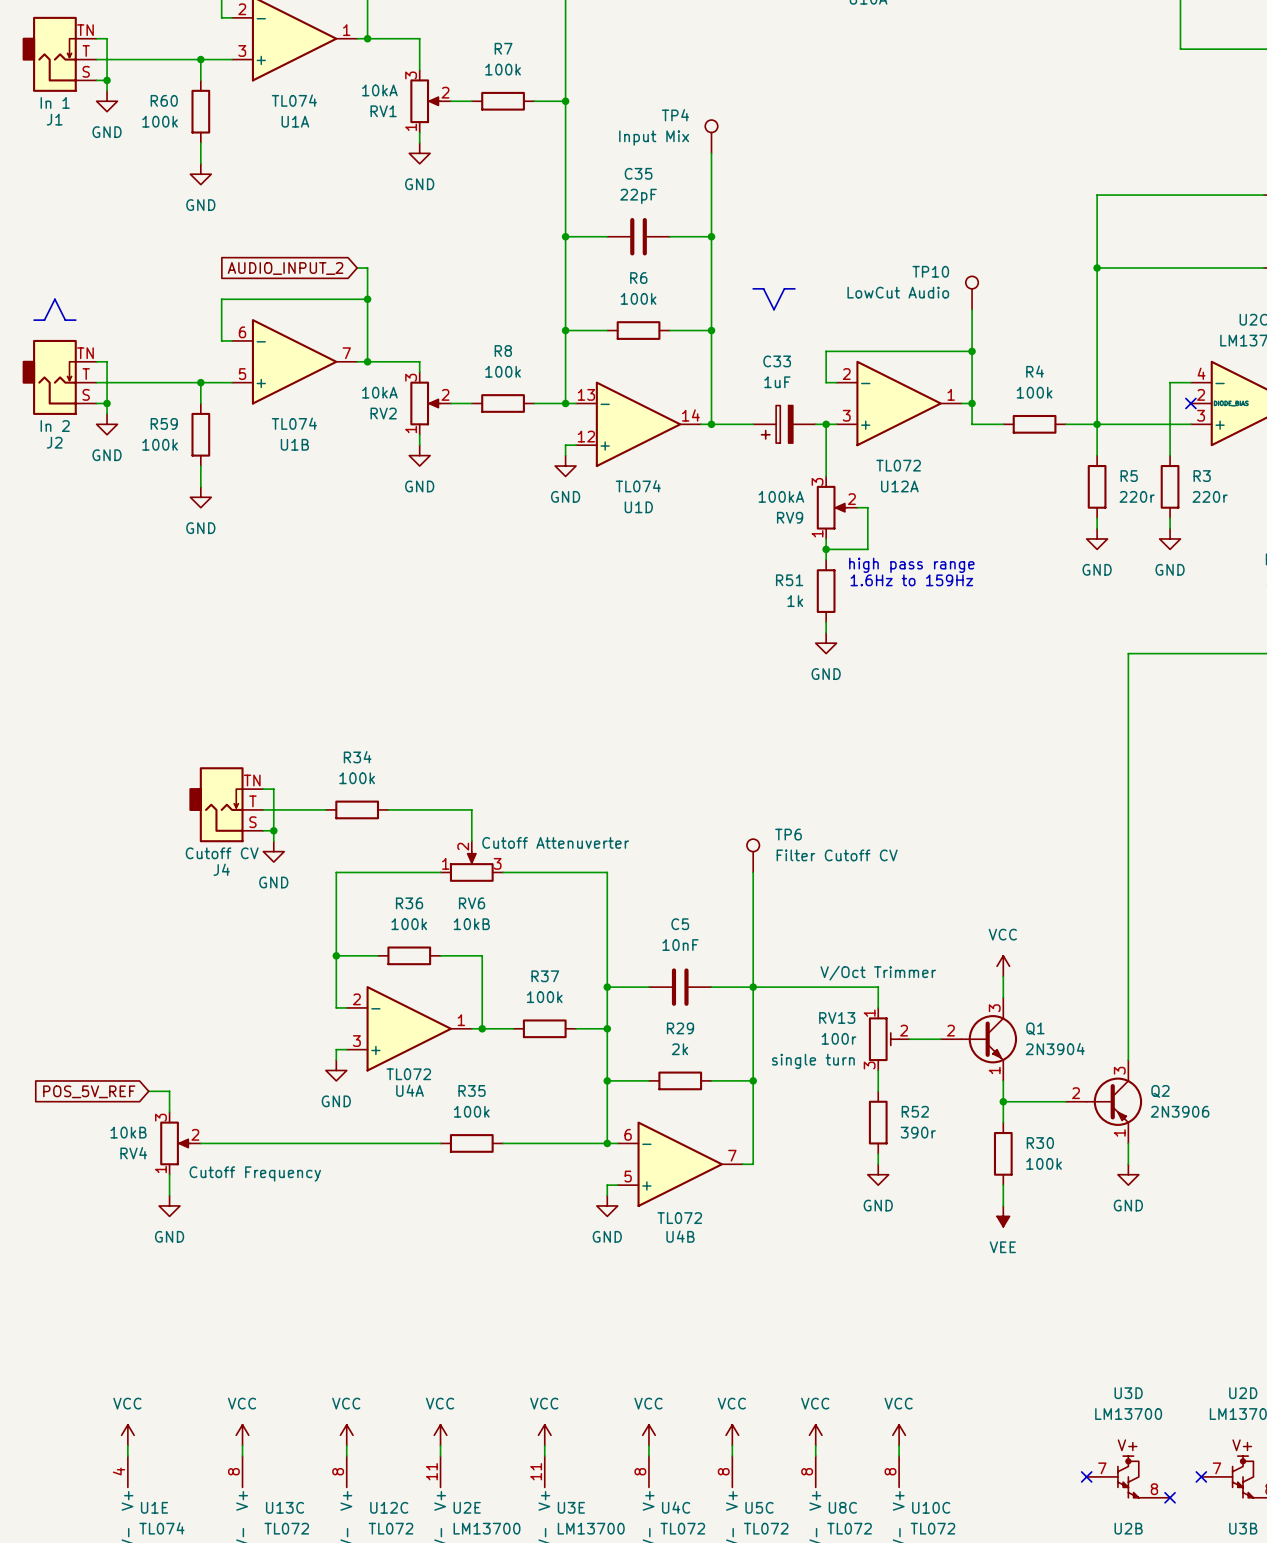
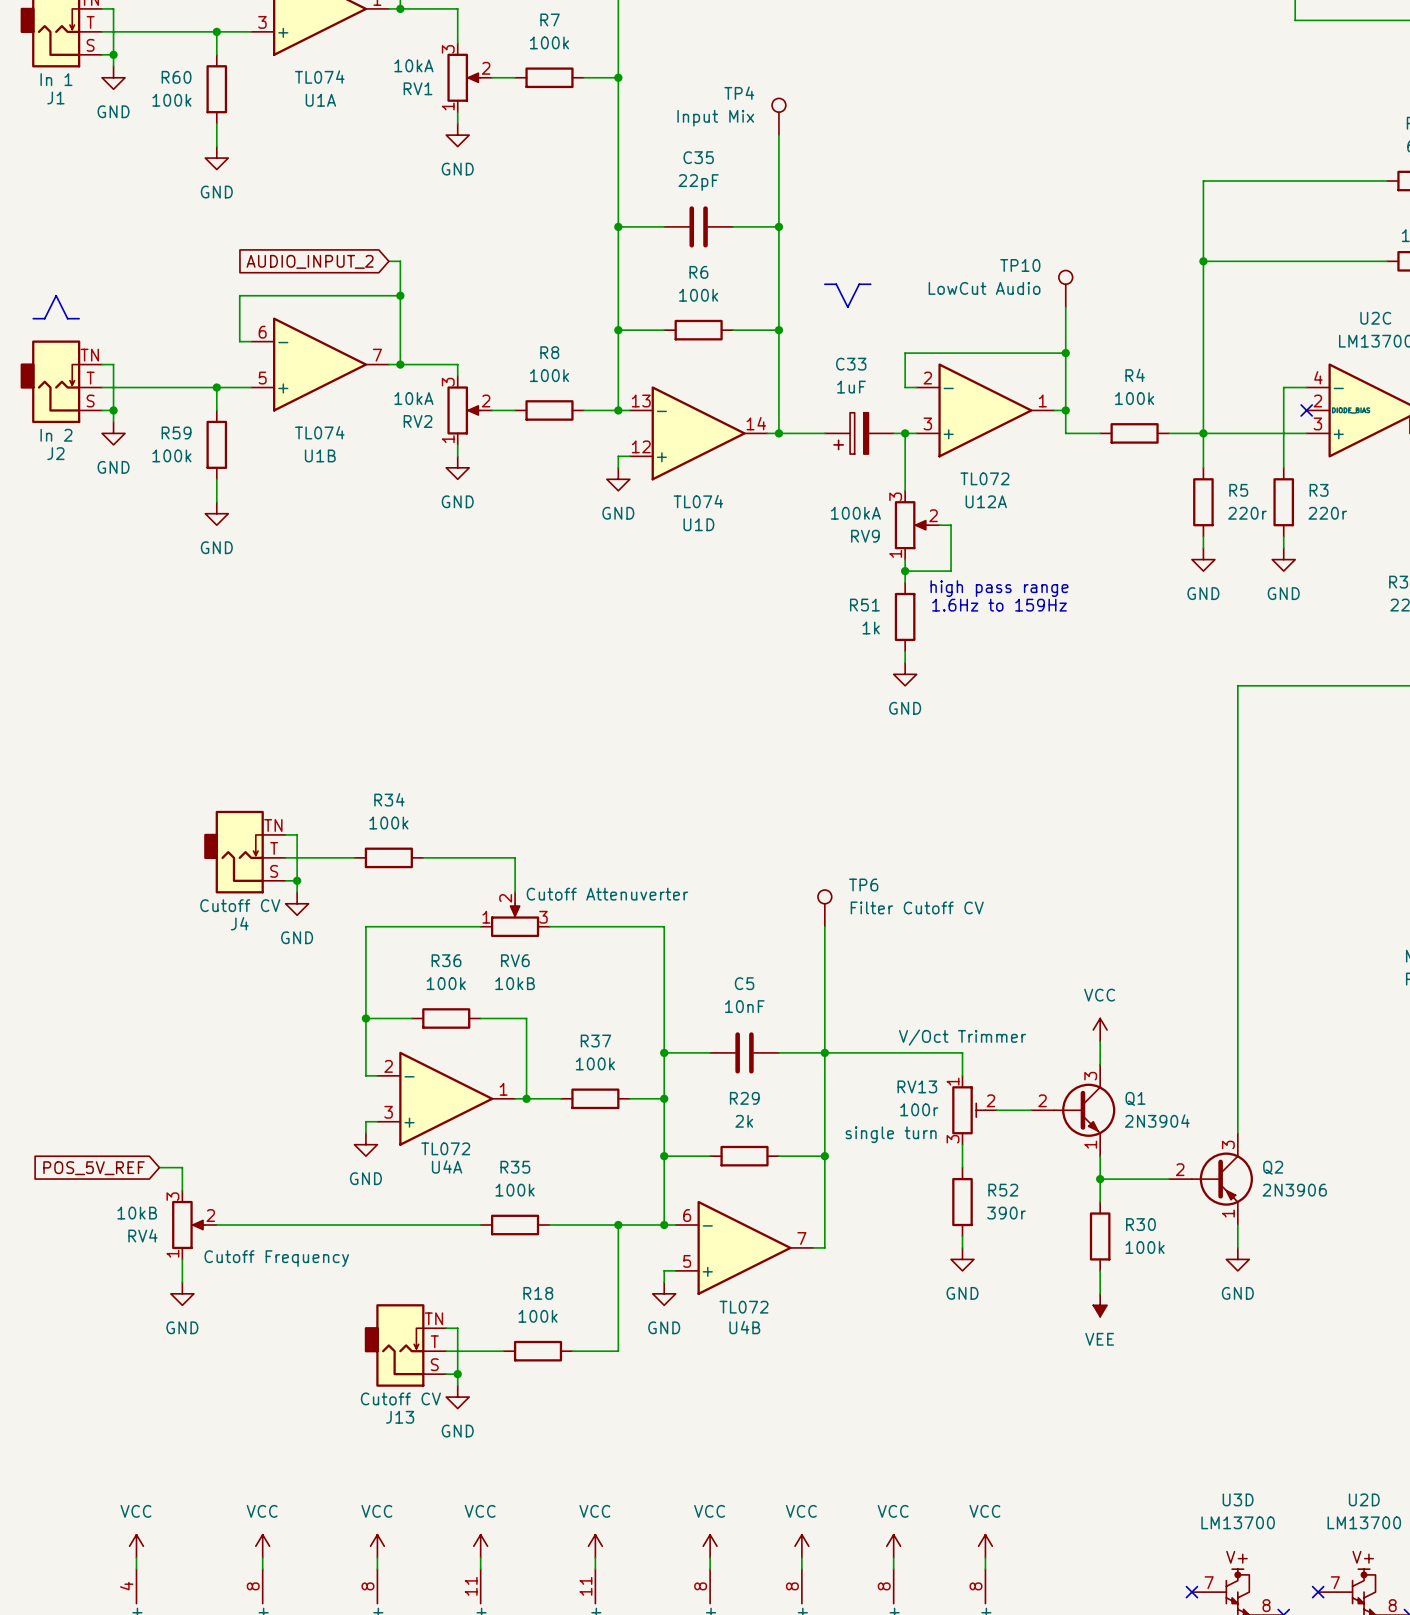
wire: none -> (618, 1225) (618, 1351) (572, 1351)
junction: none -> (618, 1225)
wire: none -> (446, 1328) (457, 1328) (457, 1385)
J13: none -> (405, 1345)
wire: none -> (446, 1351) (503, 1351)
R18: none -> 100k (538, 1351)
wire: none -> (446, 1374) (457, 1374)
junction: none -> (457, 1374)
power symbol: none -> GND (457, 1397)

